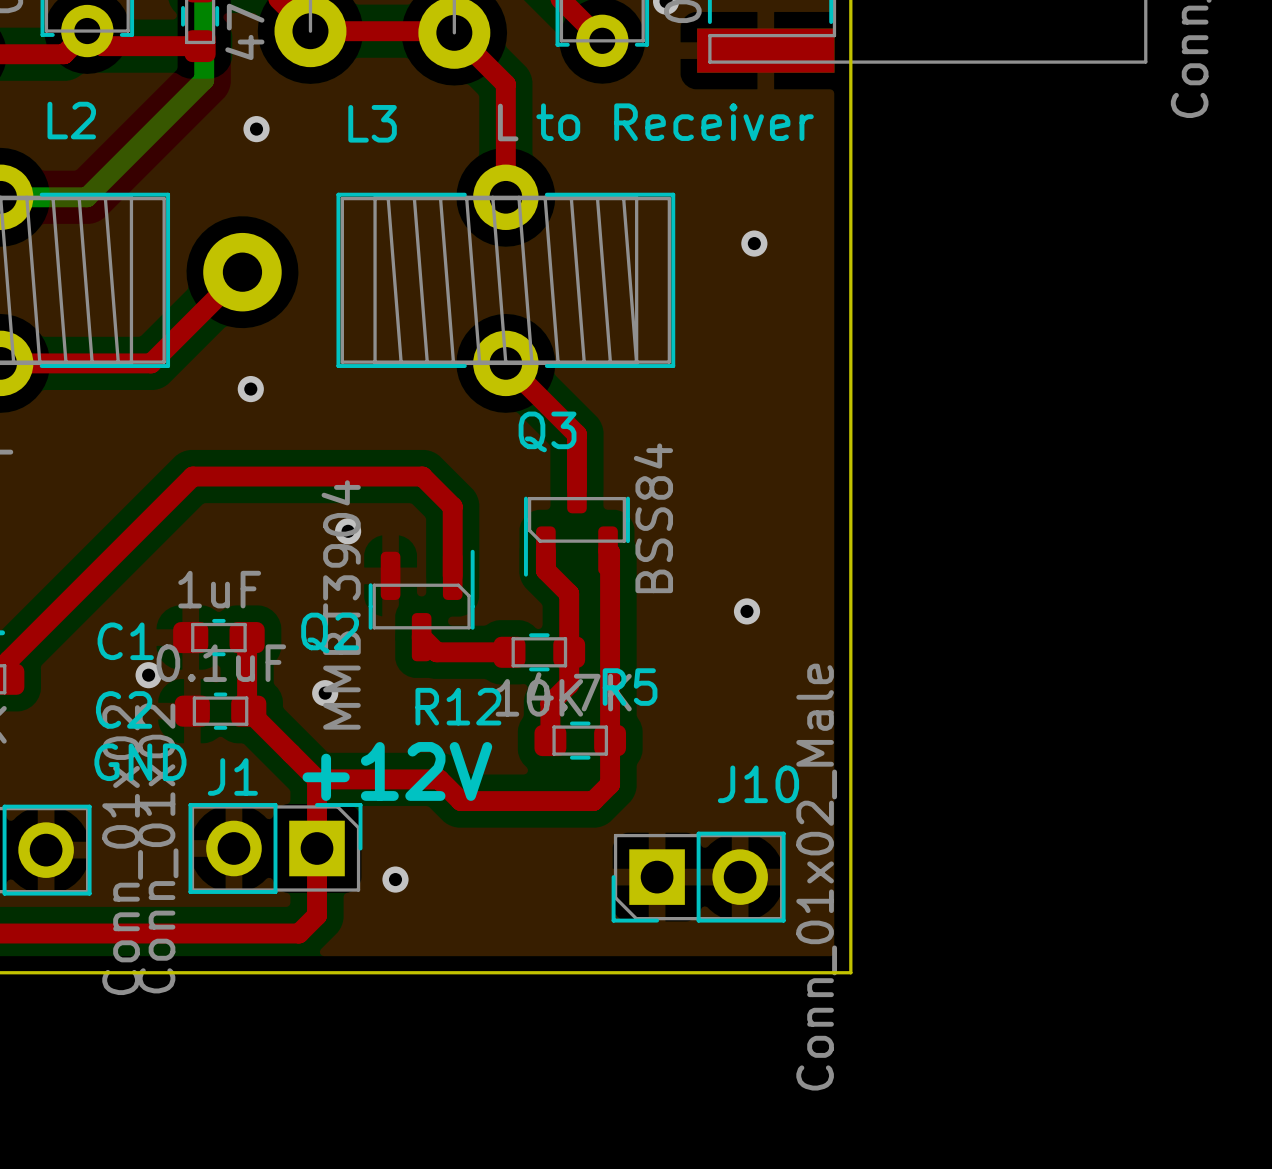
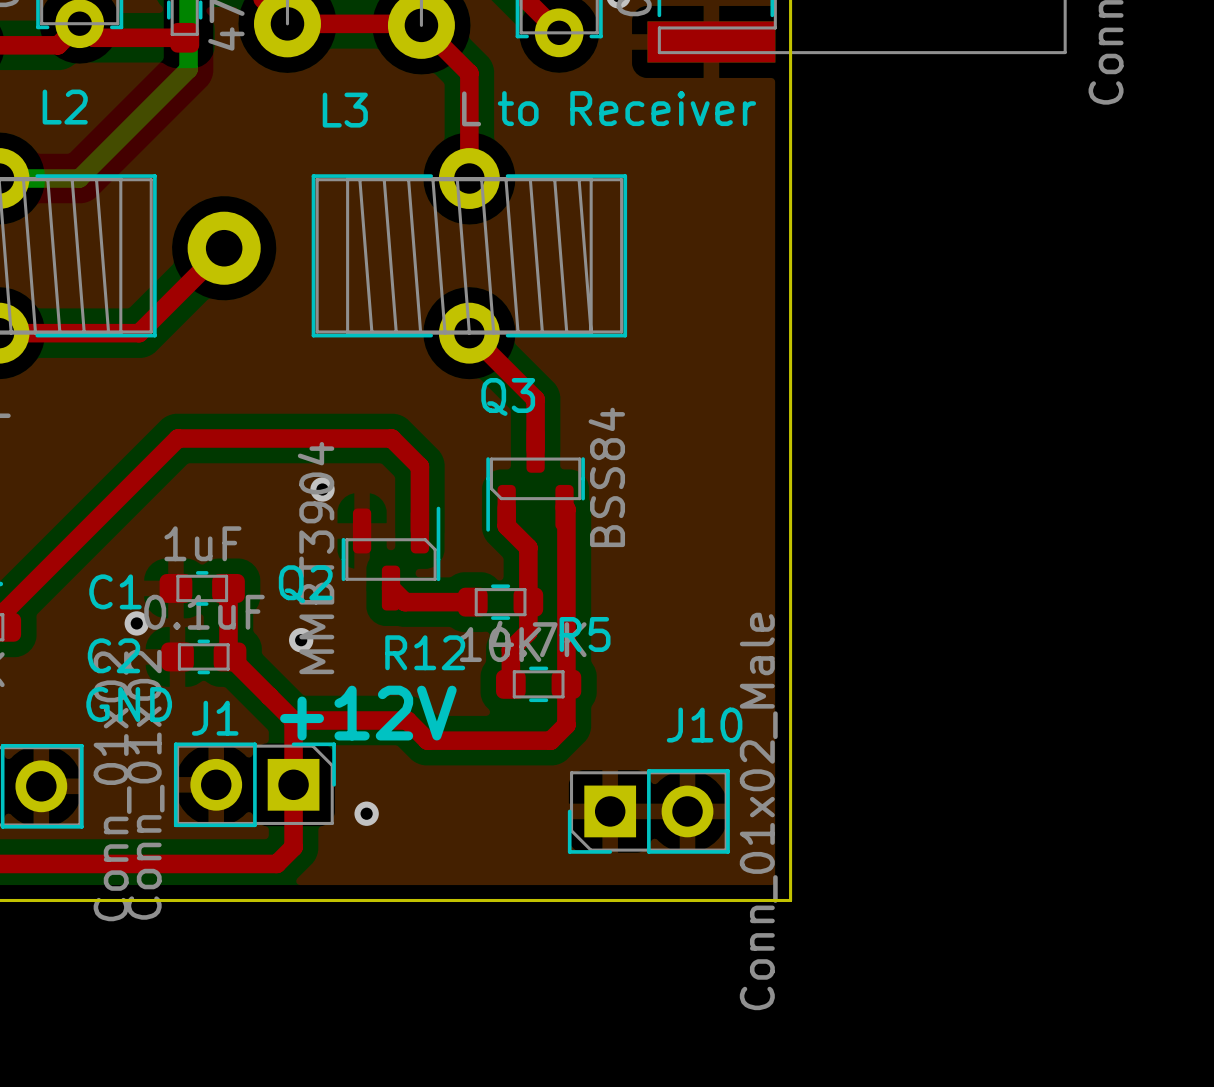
via: (256, 129) -> none
via: (754, 243) -> none
via: (250, 389) -> none
via: (747, 611) -> none

